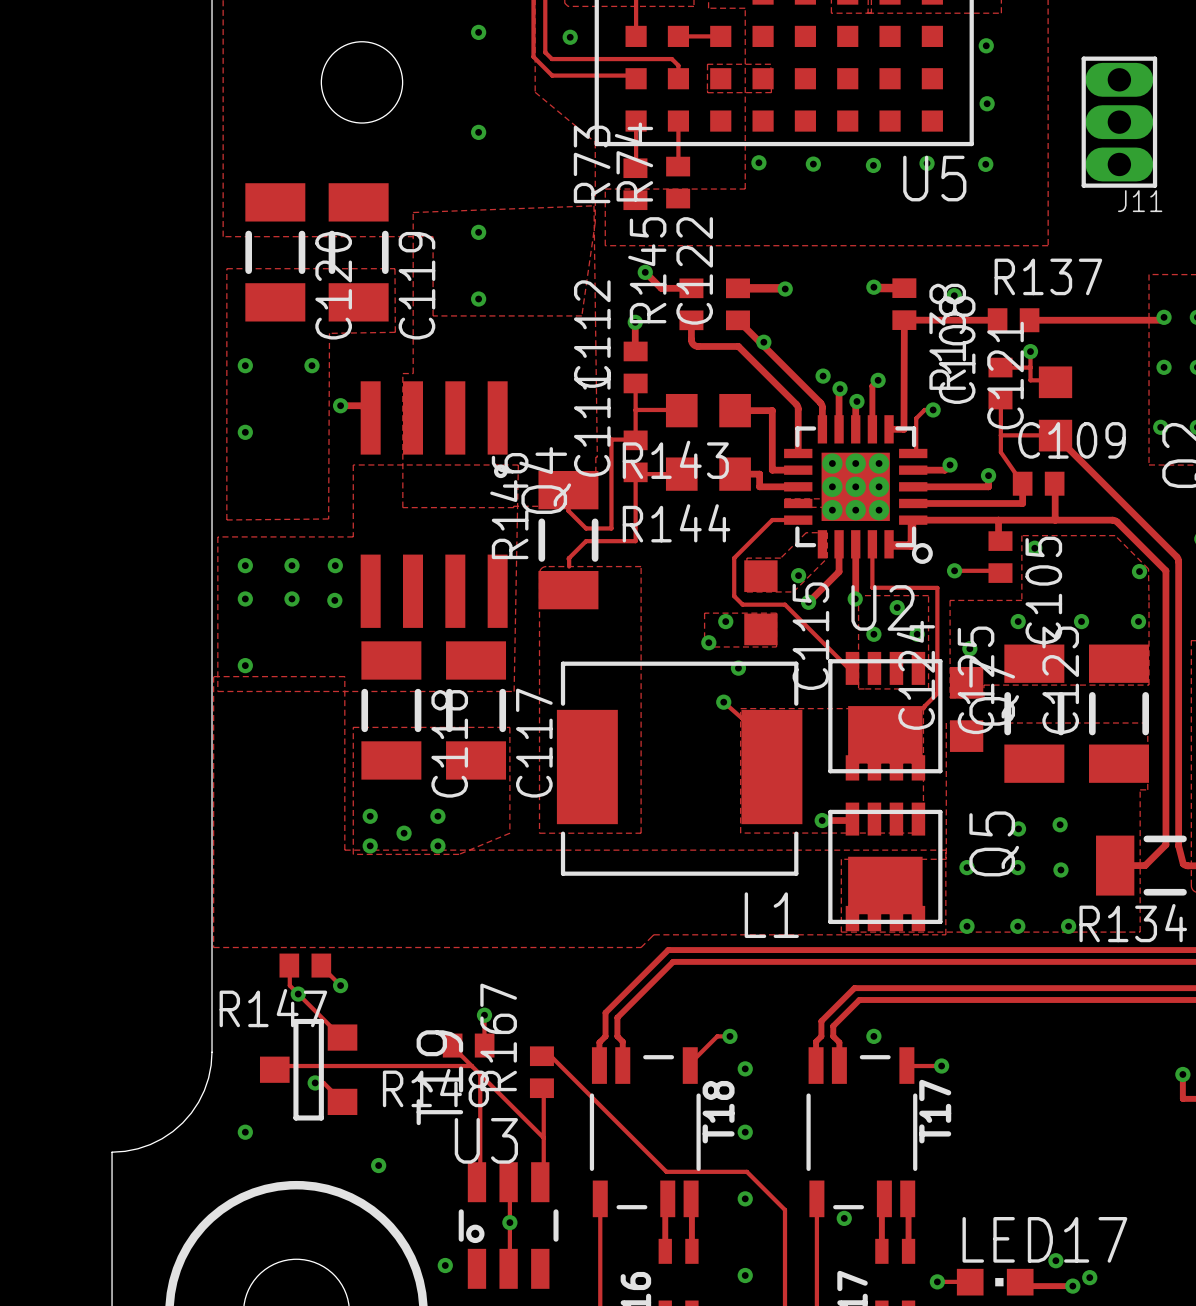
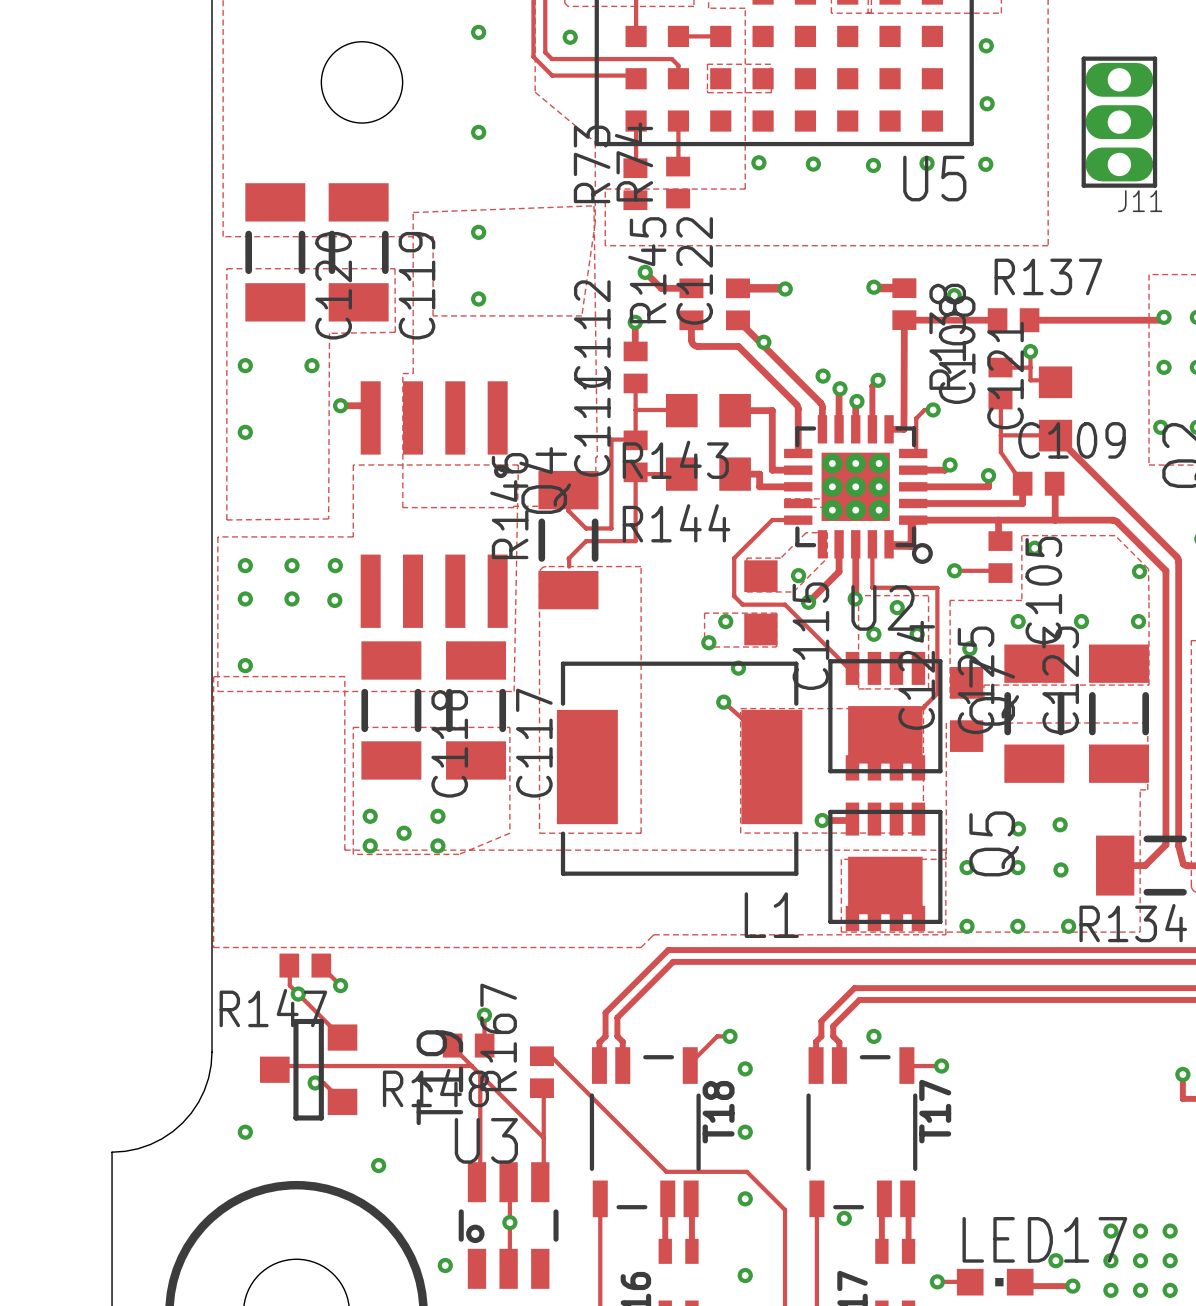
via: none -> (1110, 1231)
via: none -> (1140, 1231)
via: none -> (1170, 1231)
via: none -> (1110, 1260)
via: none -> (1140, 1260)
via: none -> (1170, 1260)
via: (1089, 1277) -> none
via: none -> (1110, 1290)
via: none -> (1140, 1290)
via: none -> (1170, 1290)

